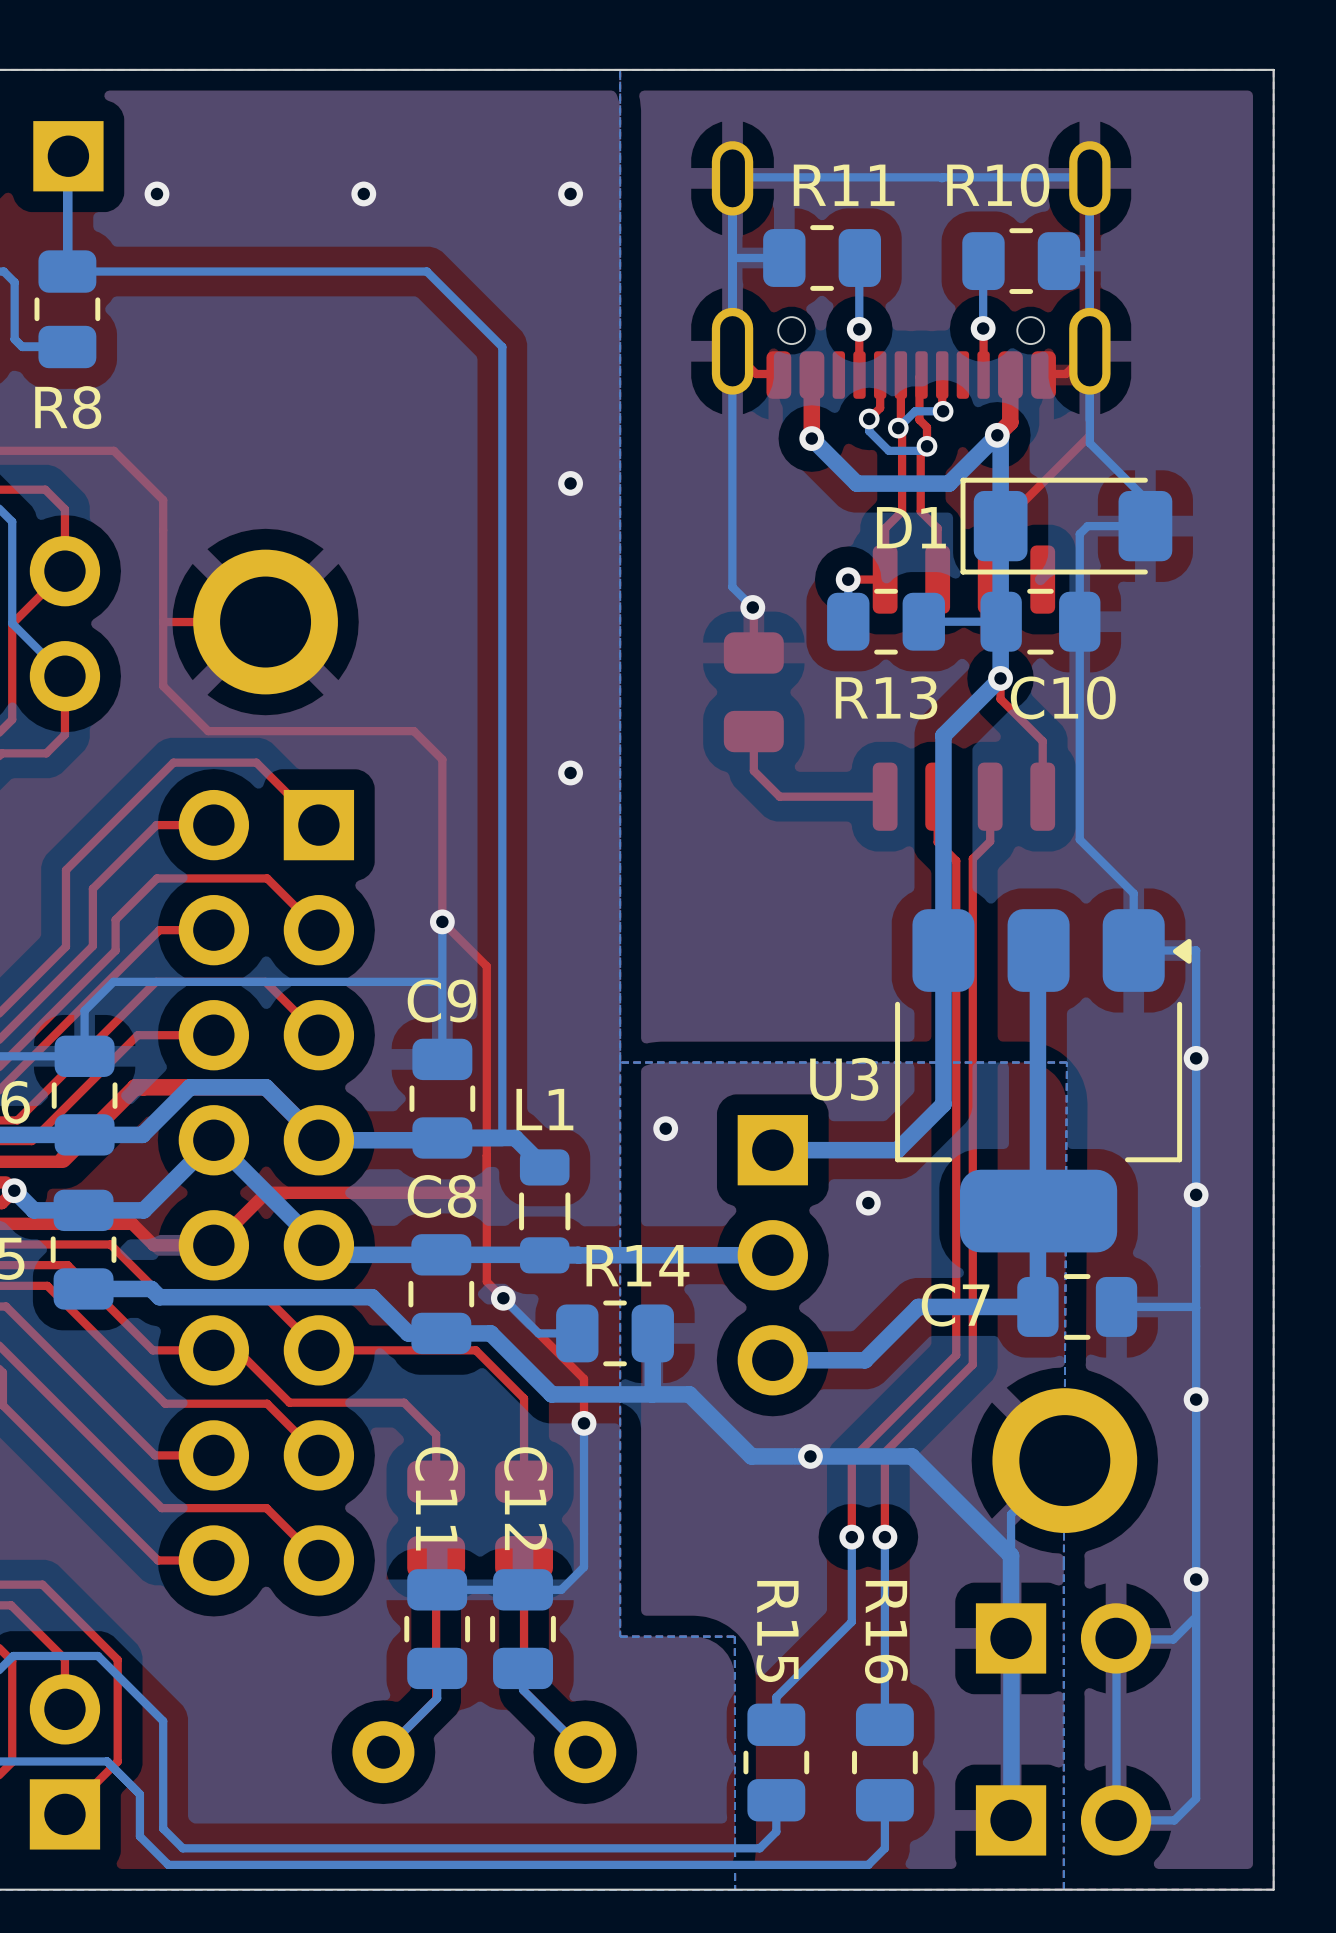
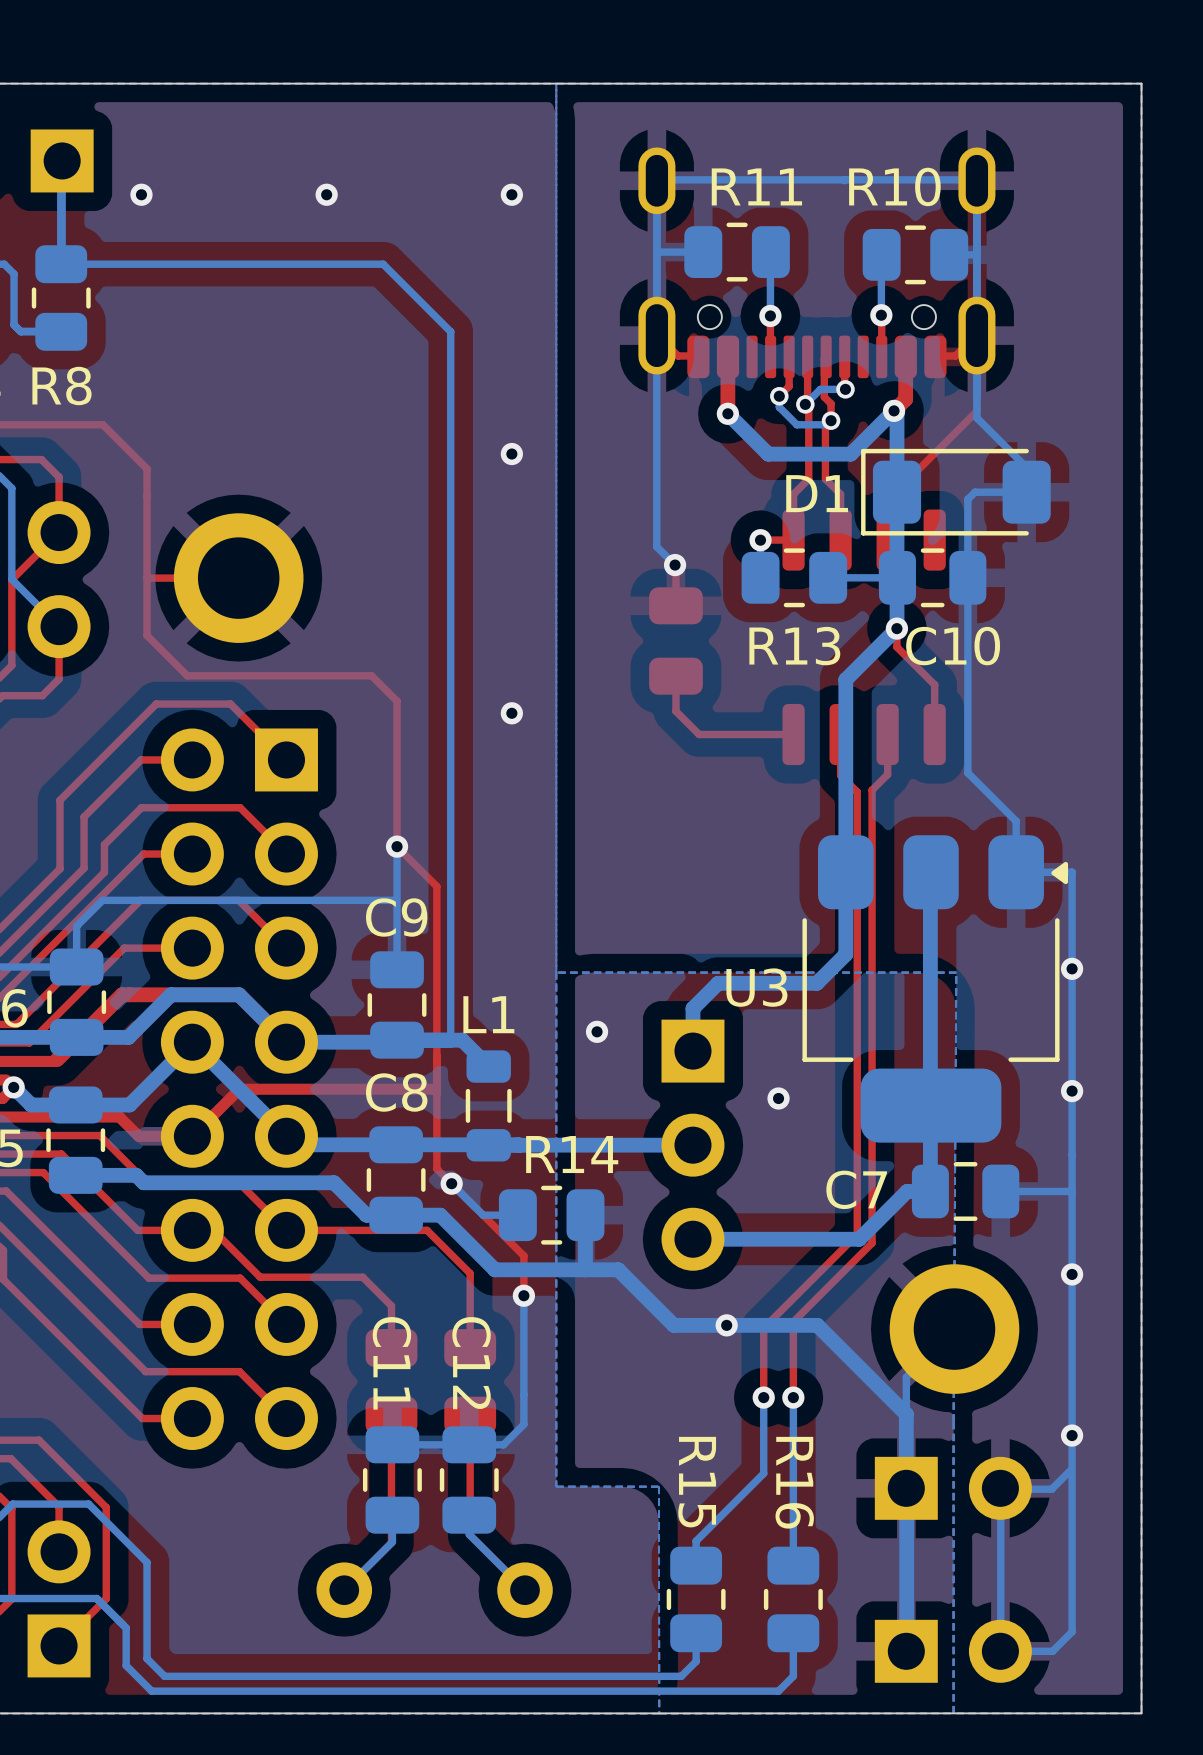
bottom track: (943, 1042) (943, 1104) (897, 1150) (772, 1150) -> (845, 954) (816, 983) (718, 983) (692, 1008) (692, 1051)
bottom track: (1011, 1306) (918, 1306) (865, 1360) -> (907, 1191) (859, 1239) (775, 1239)

